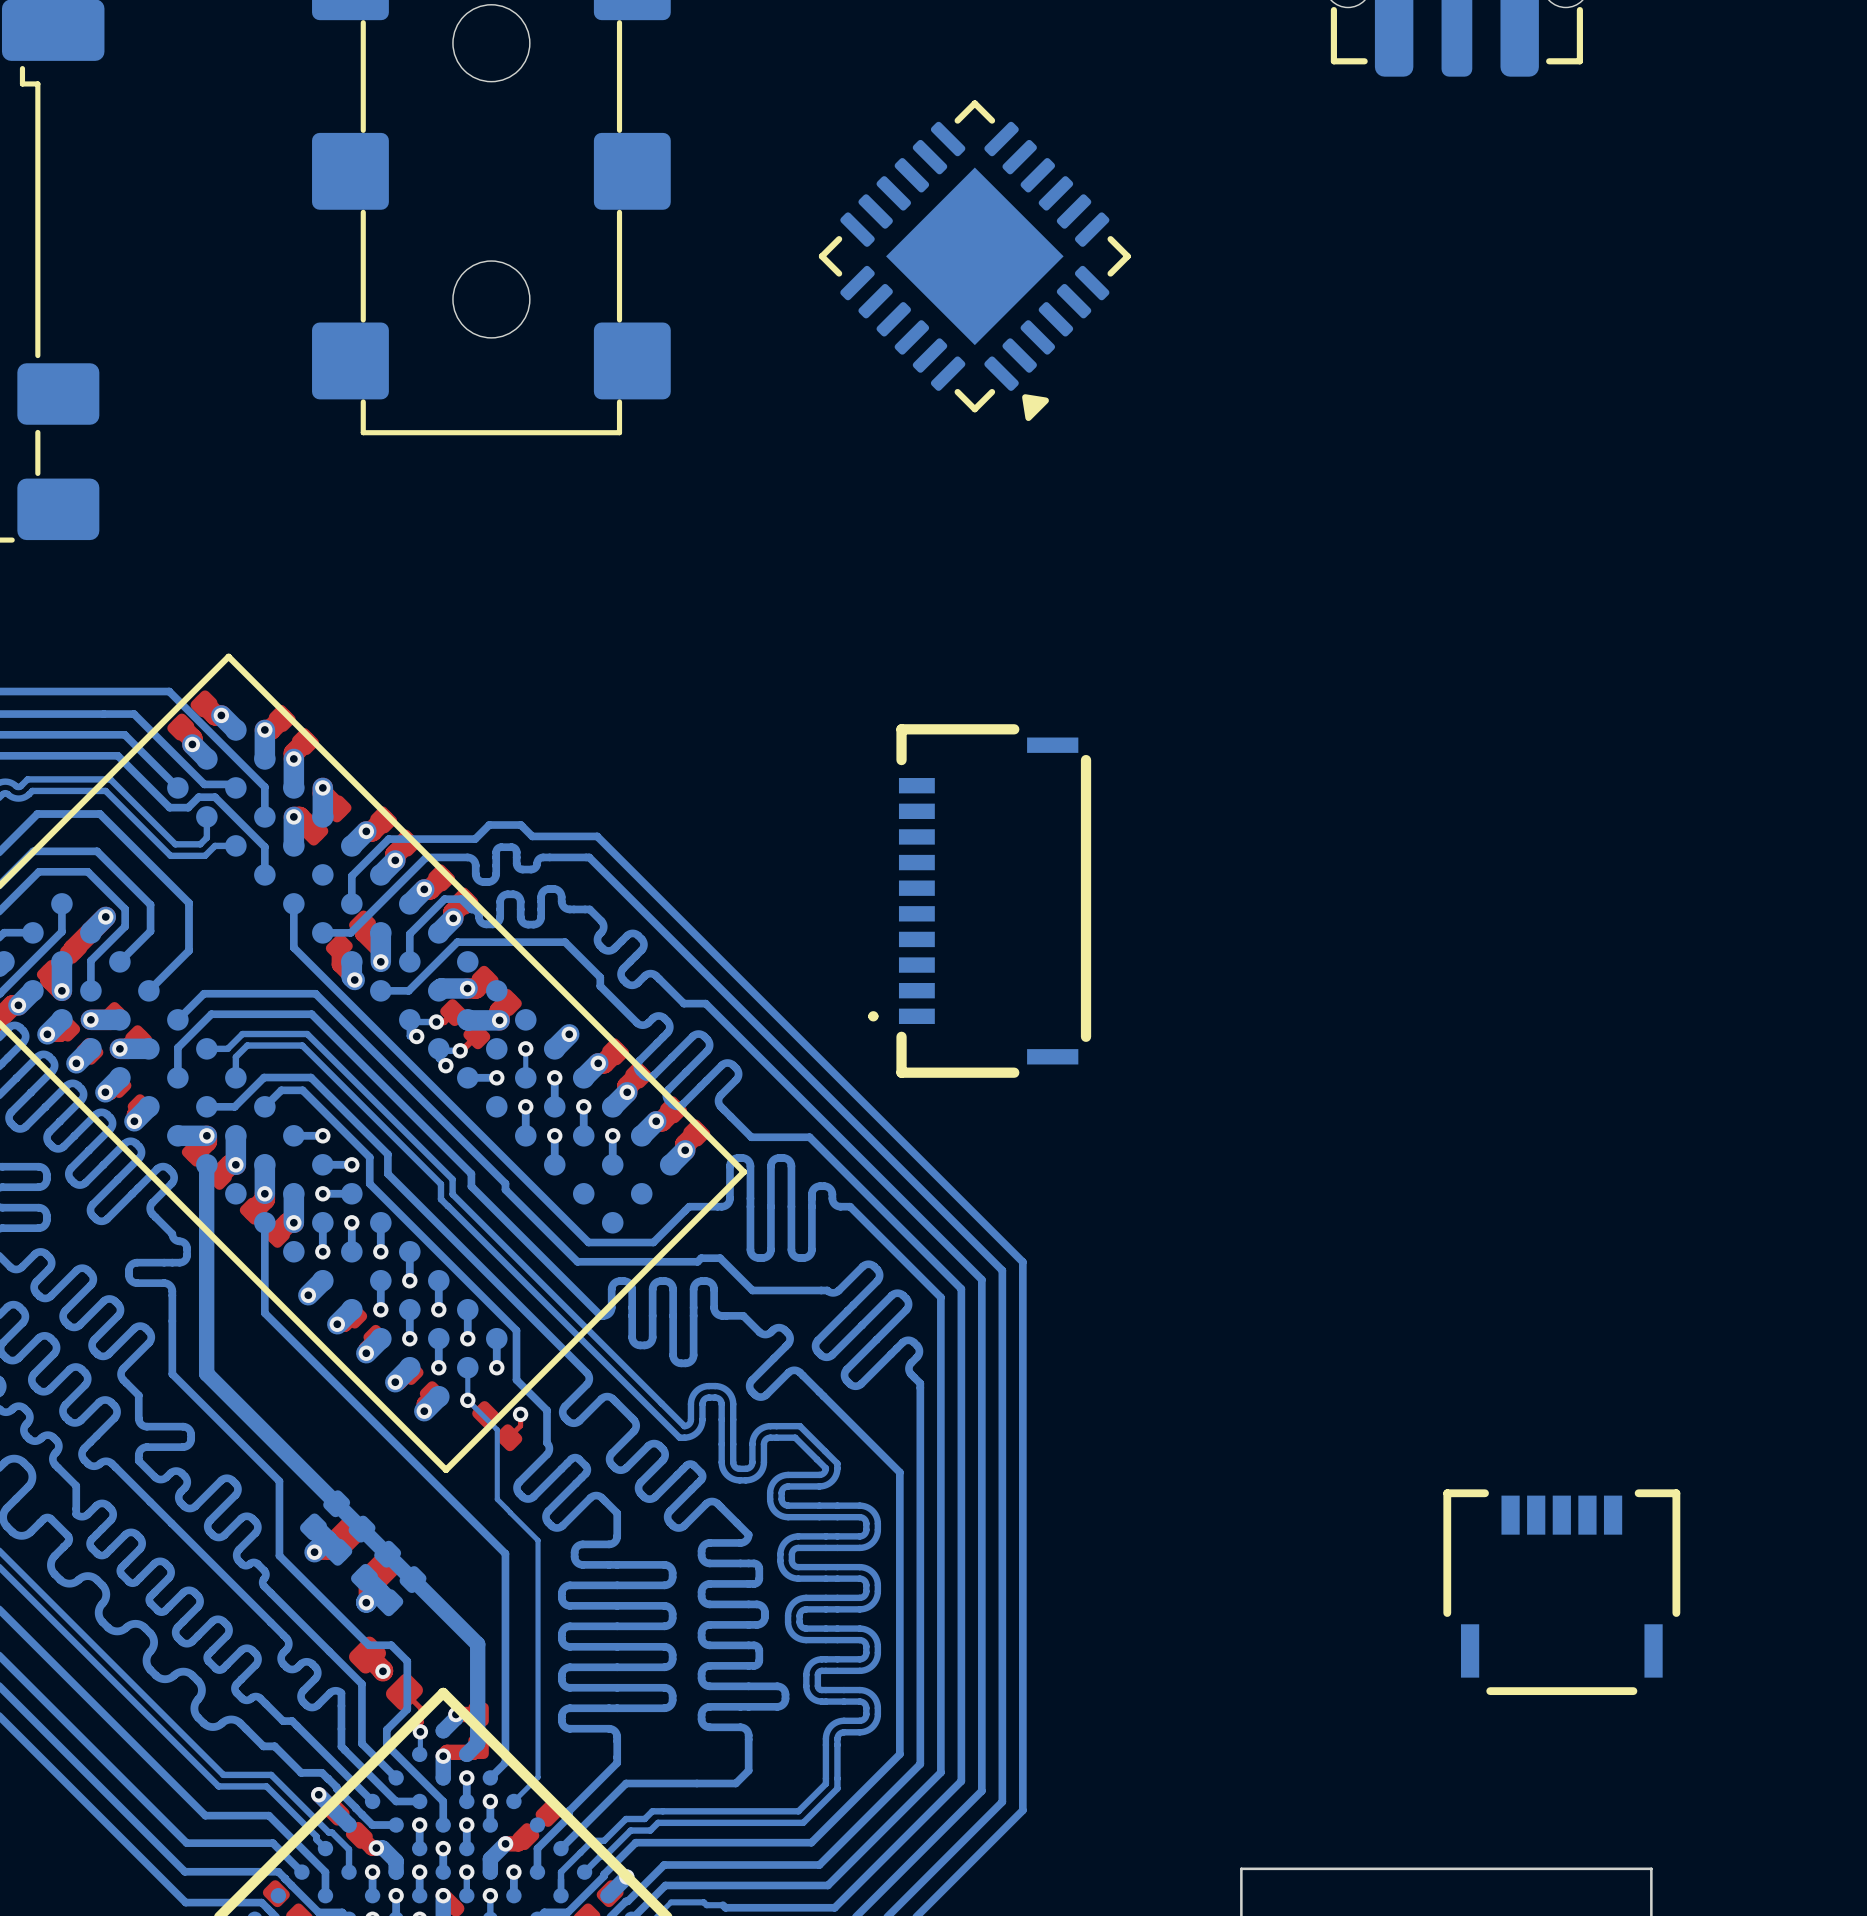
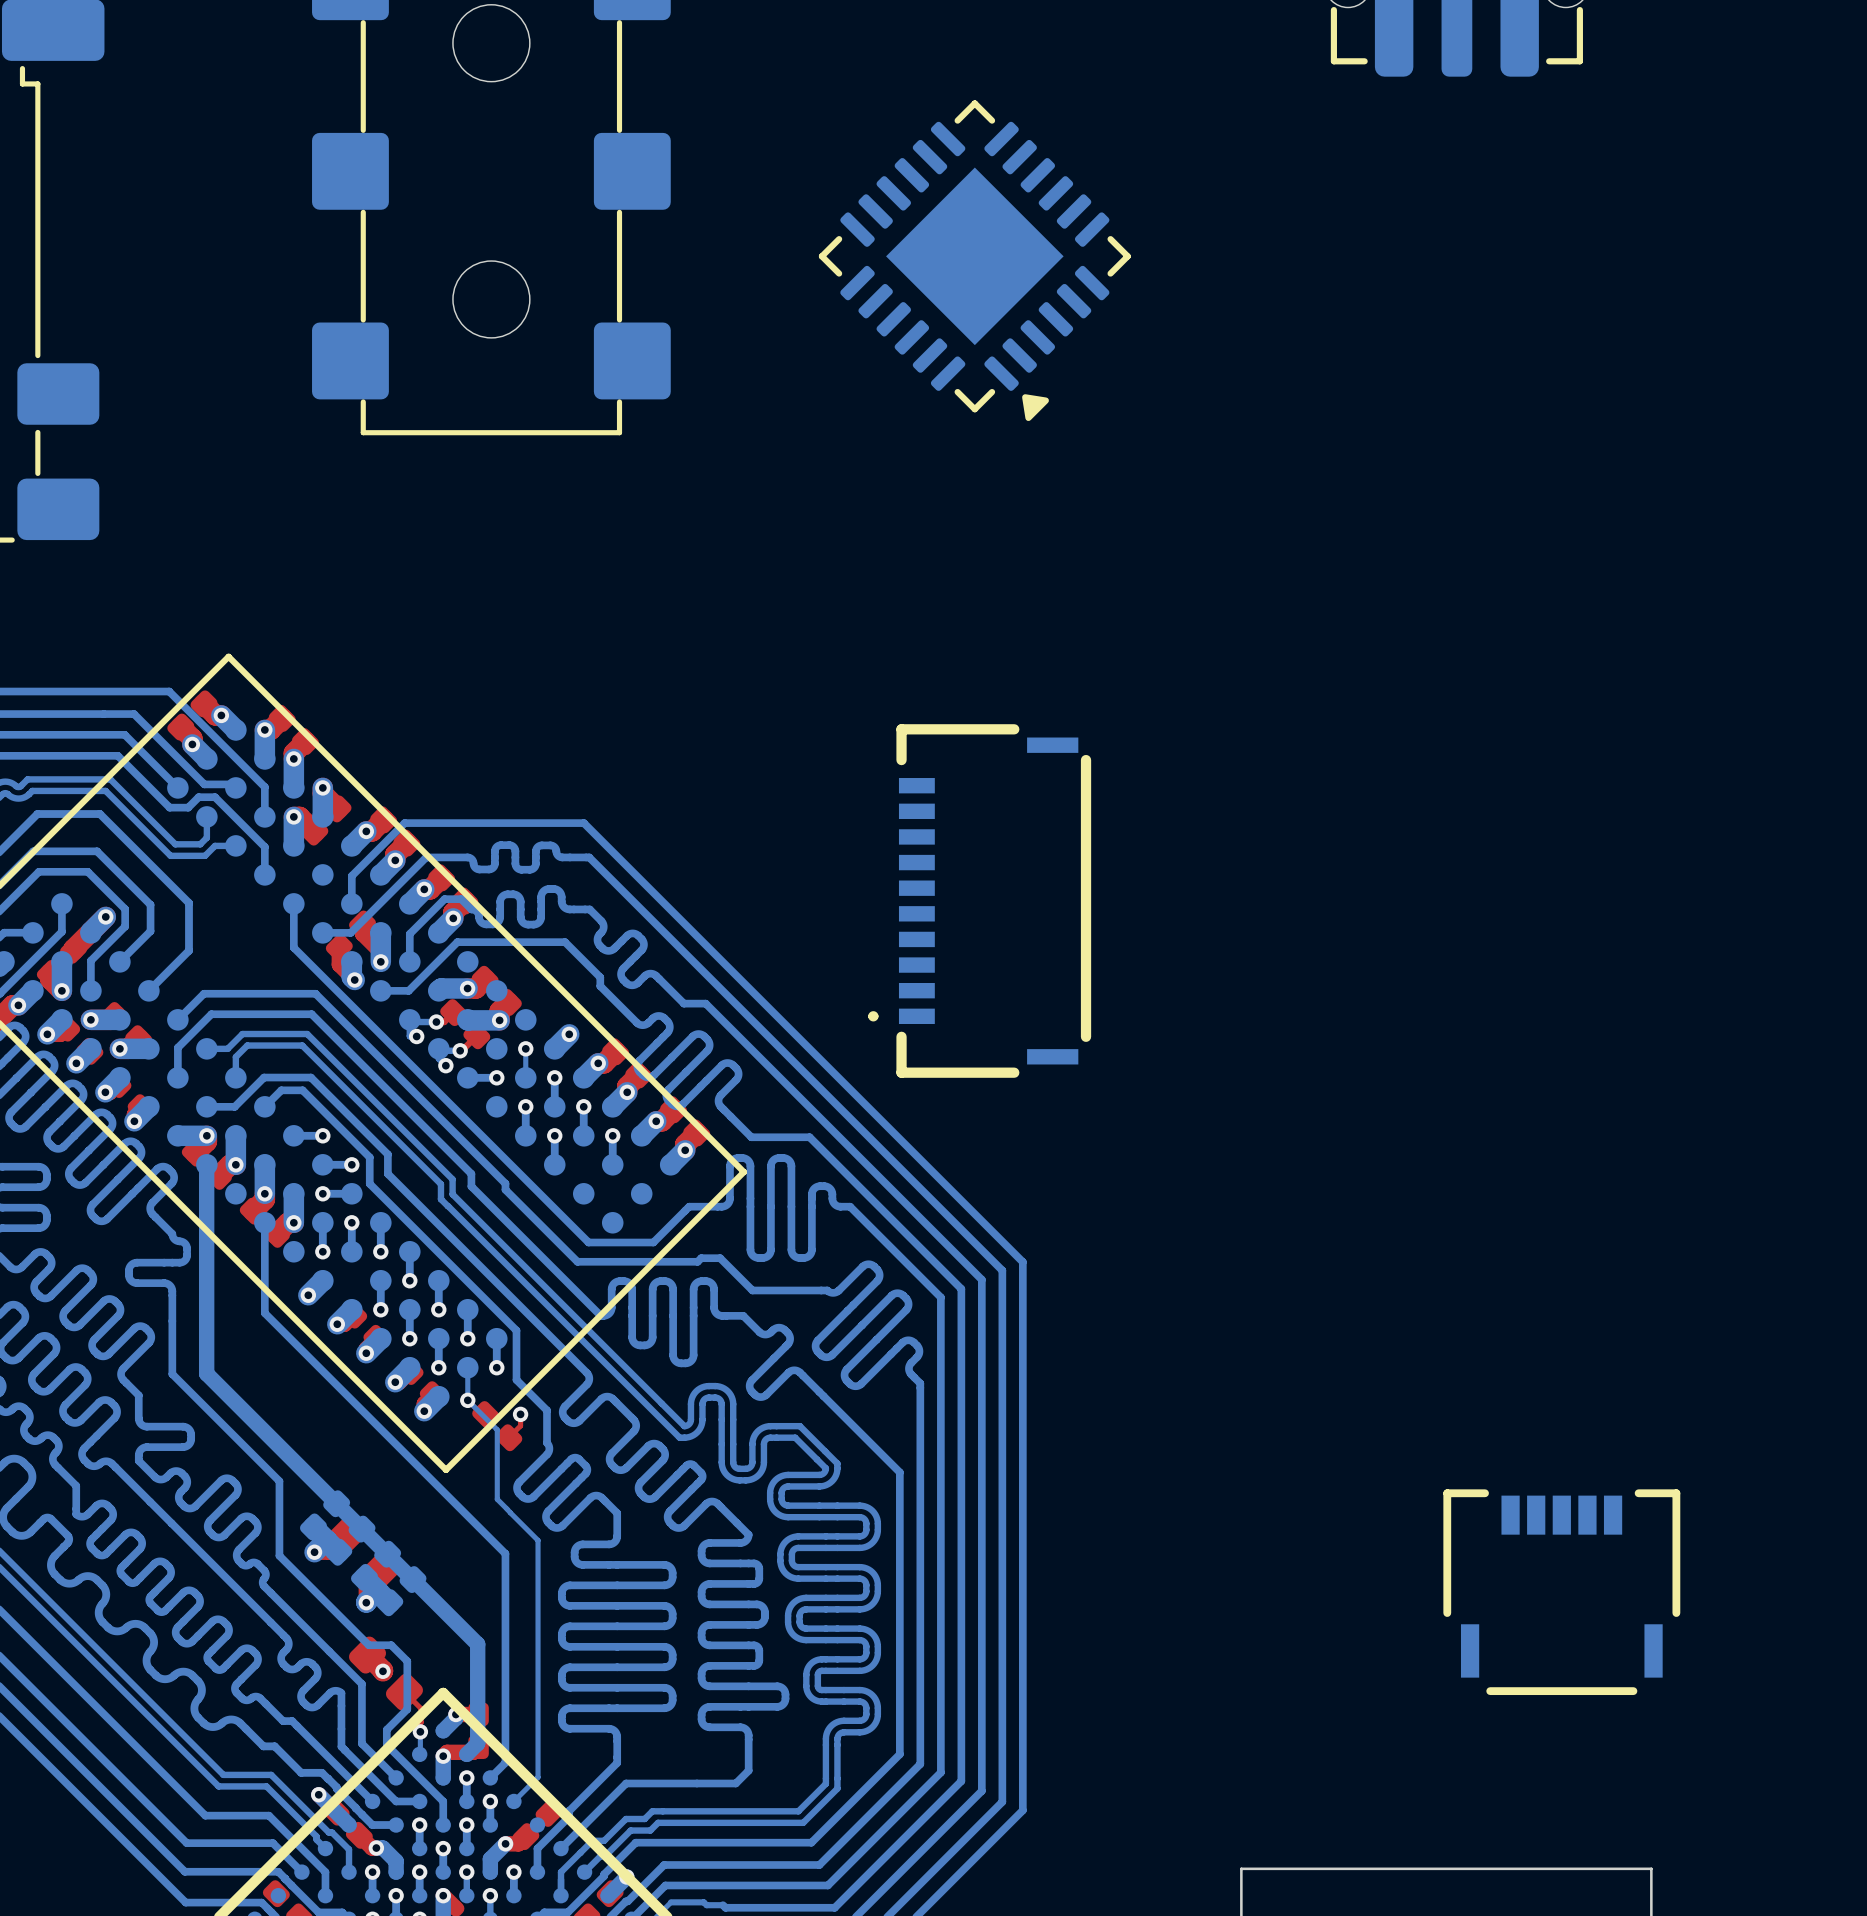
bottom track: (597, 836) (532, 836) (520, 825) (489, 825) (475, 839) (388, 839) -> (597, 836) (583, 823) (404, 823) (388, 839)
bottom track: (467, 857) (474, 861) (476, 877) (481, 881) (490, 881) (495, 877) (496, 851) (499, 847) (515, 848) (517, 865) (522, 869) -> (467, 857) (472, 859) (476, 868) (490, 869) (494, 865) (496, 847) (500, 845) (510, 845) (515, 849) (515, 865) (522, 869)
bottom track: (562, 857) (541, 857) (535, 867) (529, 869) -> (562, 857) (557, 855) (553, 846) (539, 845) (536, 849) (535, 865) (529, 869)

